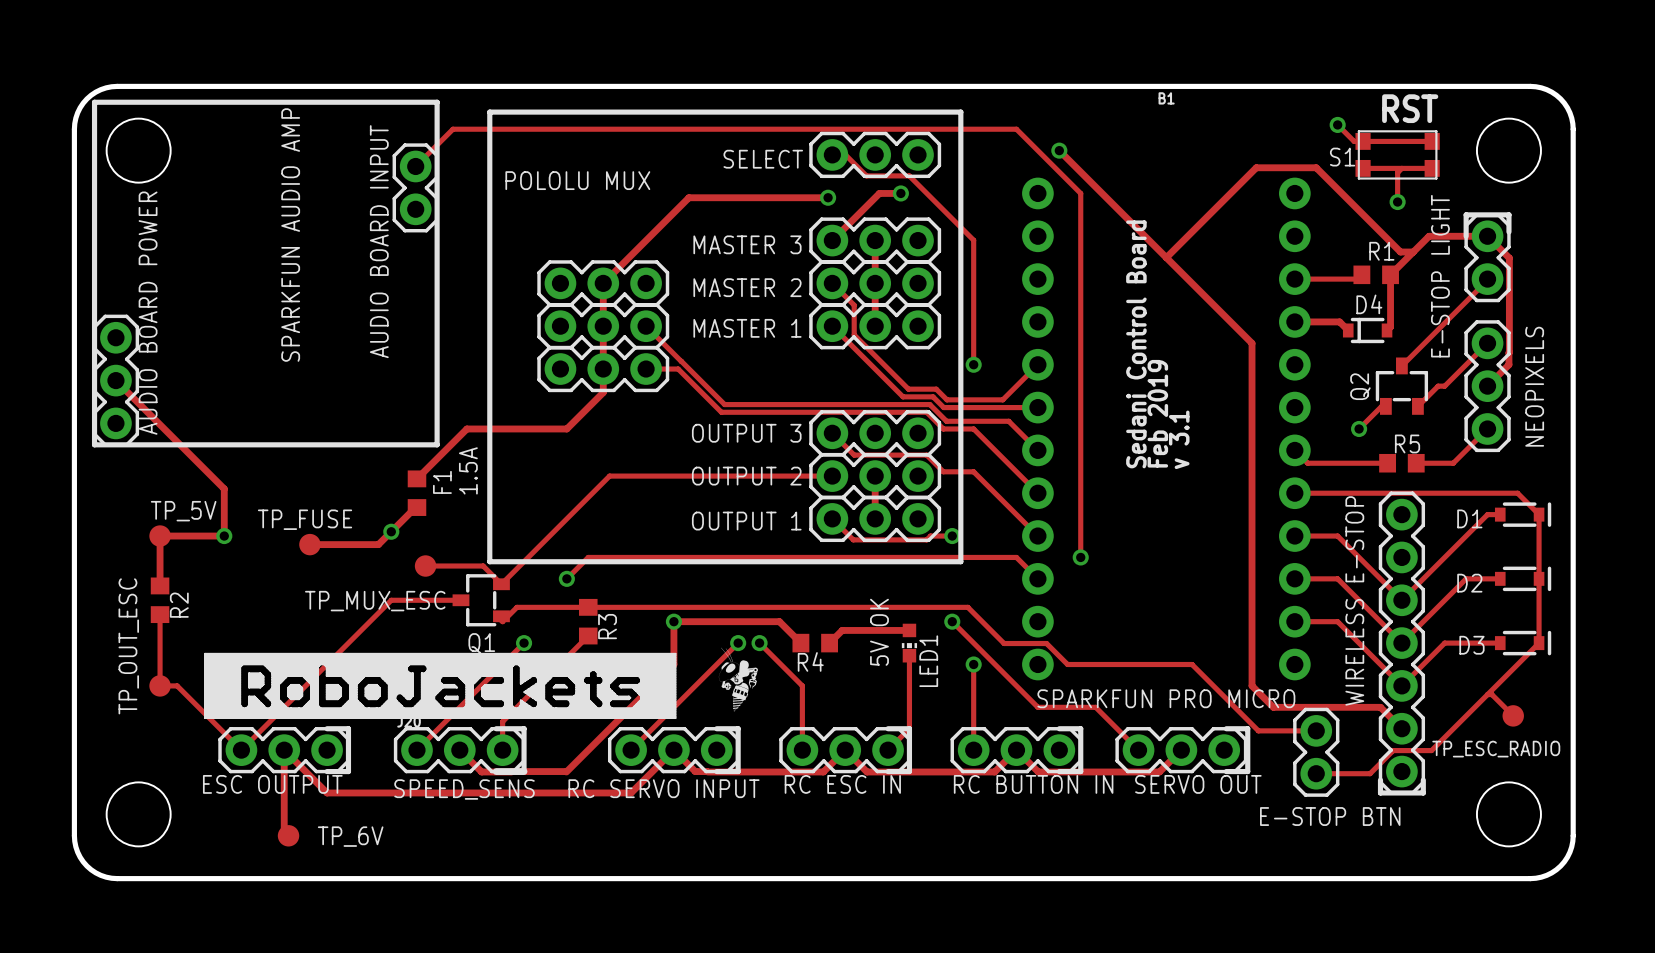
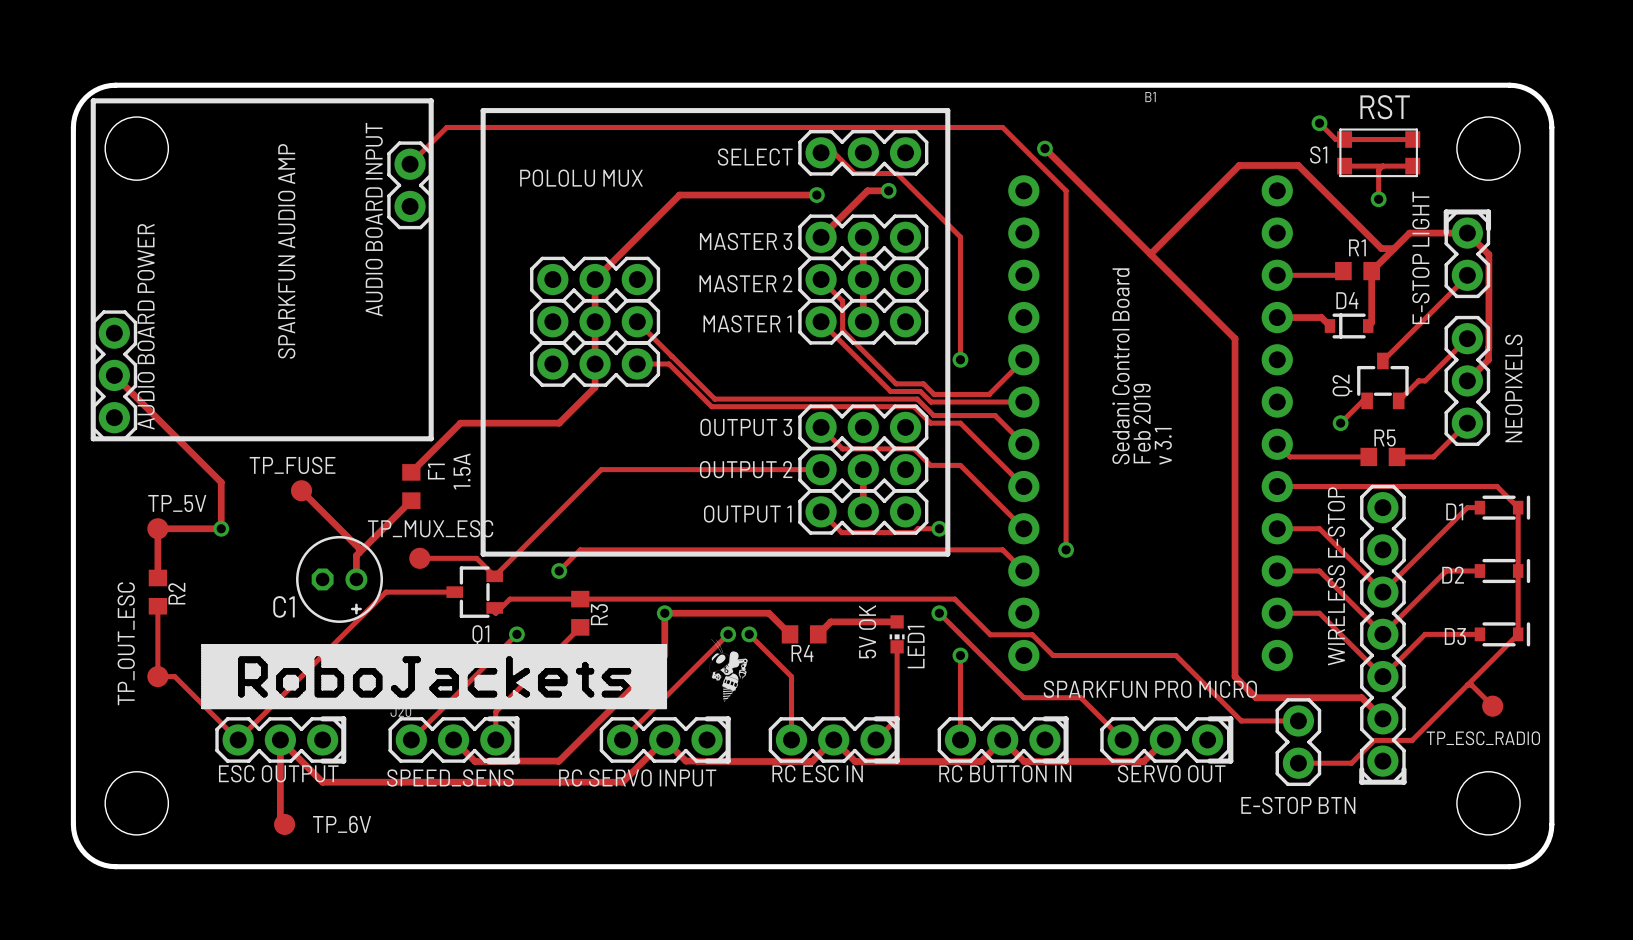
track: none -> (301, 490) (359, 548) (359, 552)
track: (416, 507) (378, 544) (309, 544) -> (411, 500) (356, 555) (356, 579)
via: (391, 531) -> none
TP_FUSE position: (309, 544) -> (301, 490)
C1: none -> (339, 579)
TP_MUX_ESC name position: TP_MUX_ESC (375, 601) -> TP_MUX_ESC (430, 528)

